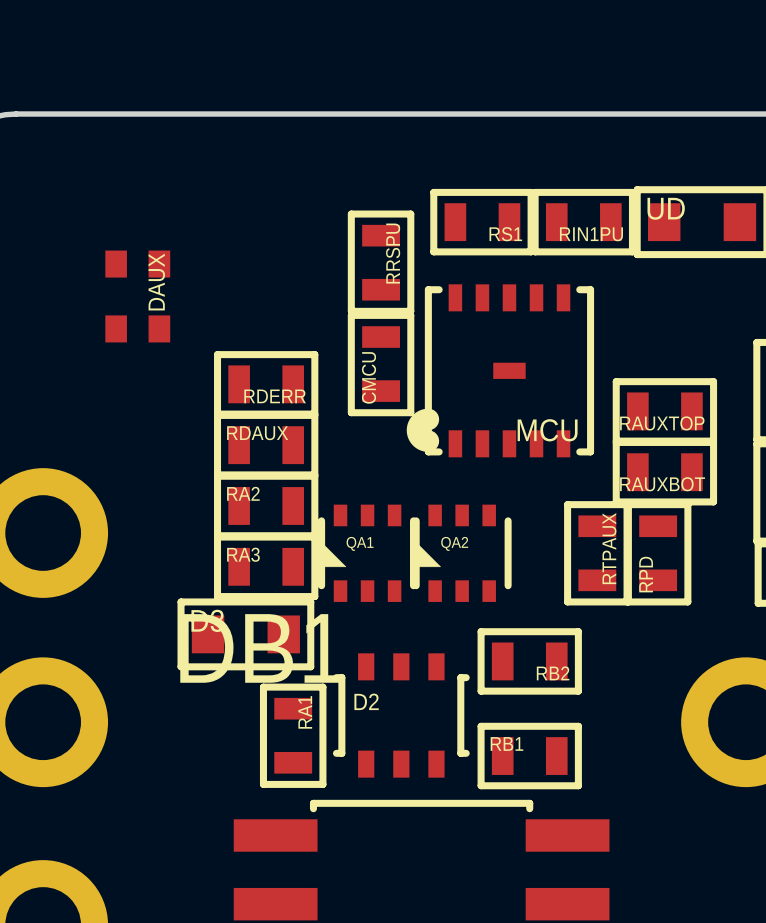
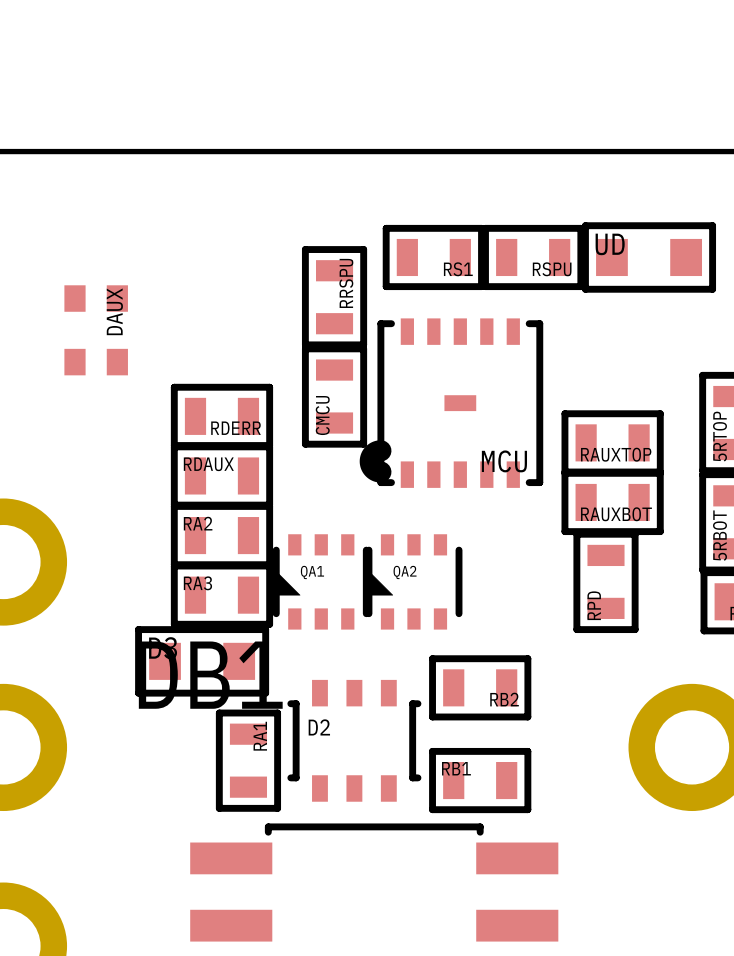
RIN1PU name: RIN1PU (591, 234) -> RSPU (552, 269)
RTPAUX: (597, 553) -> none

